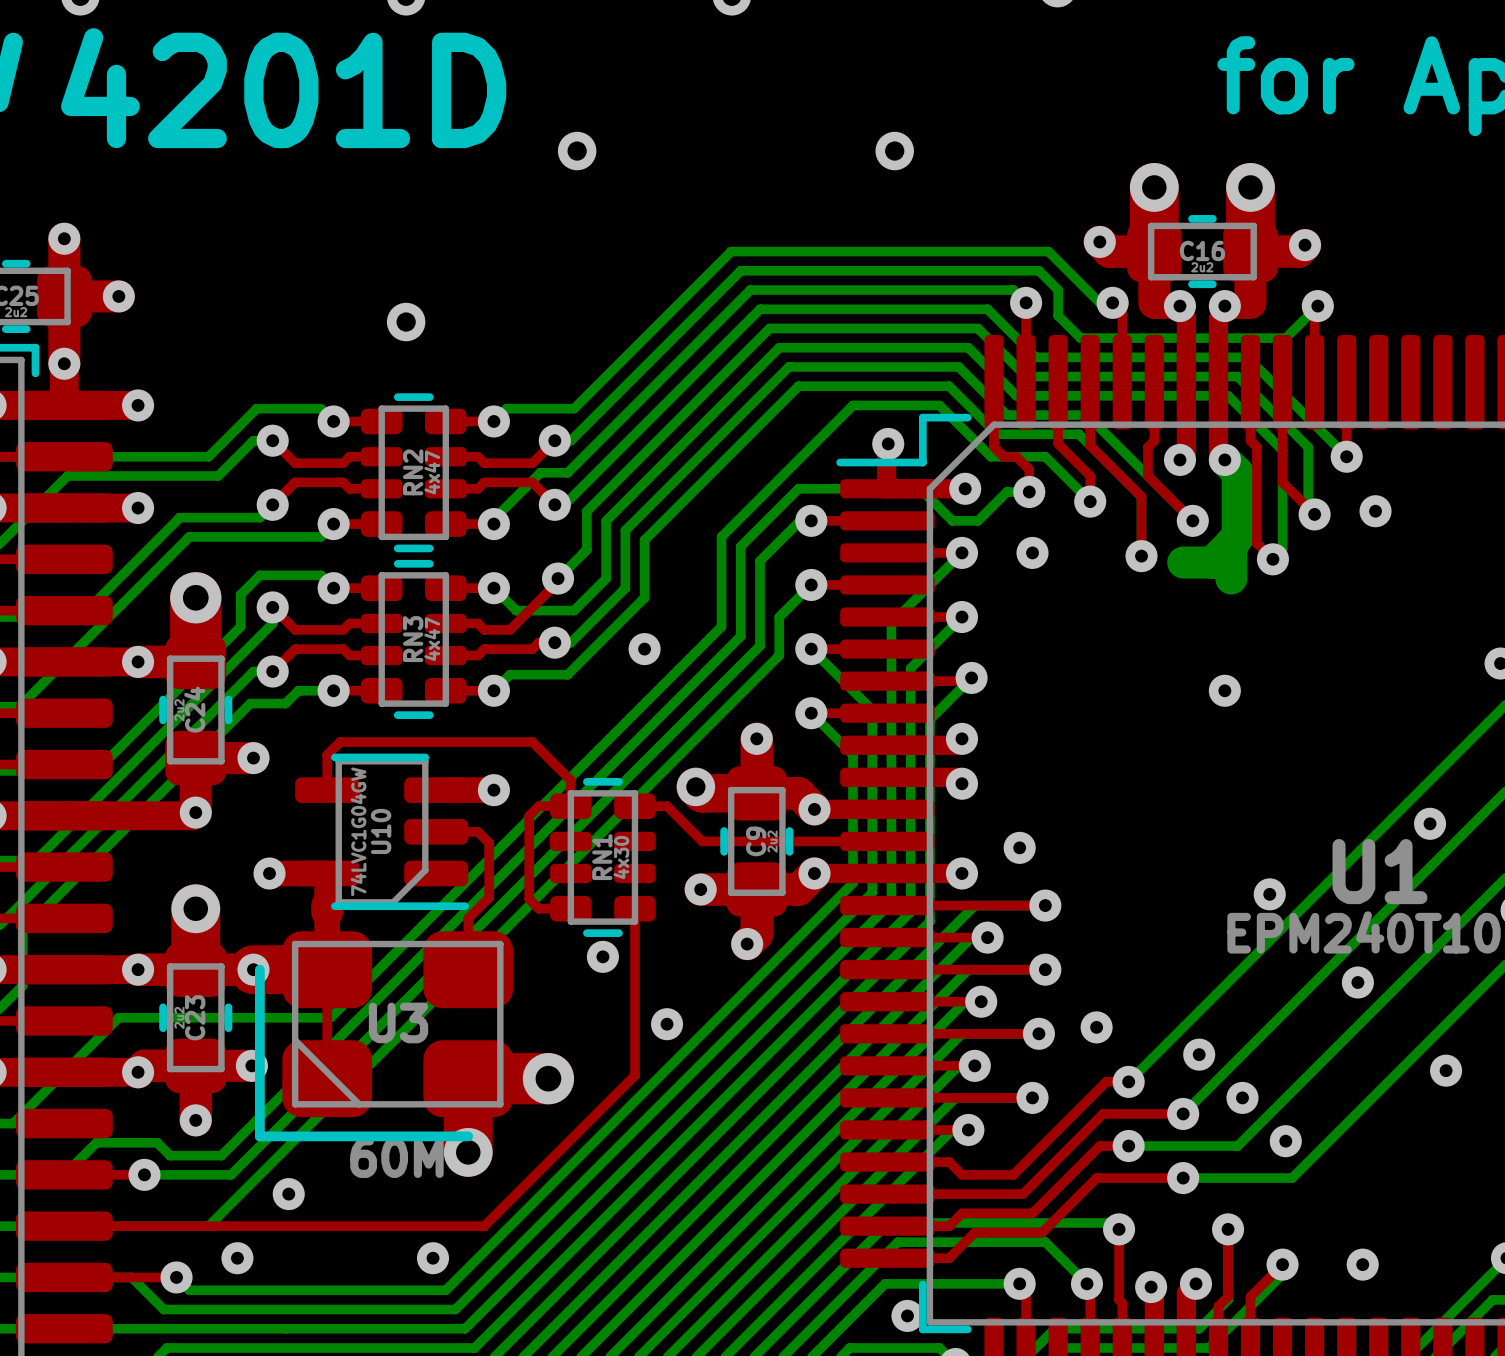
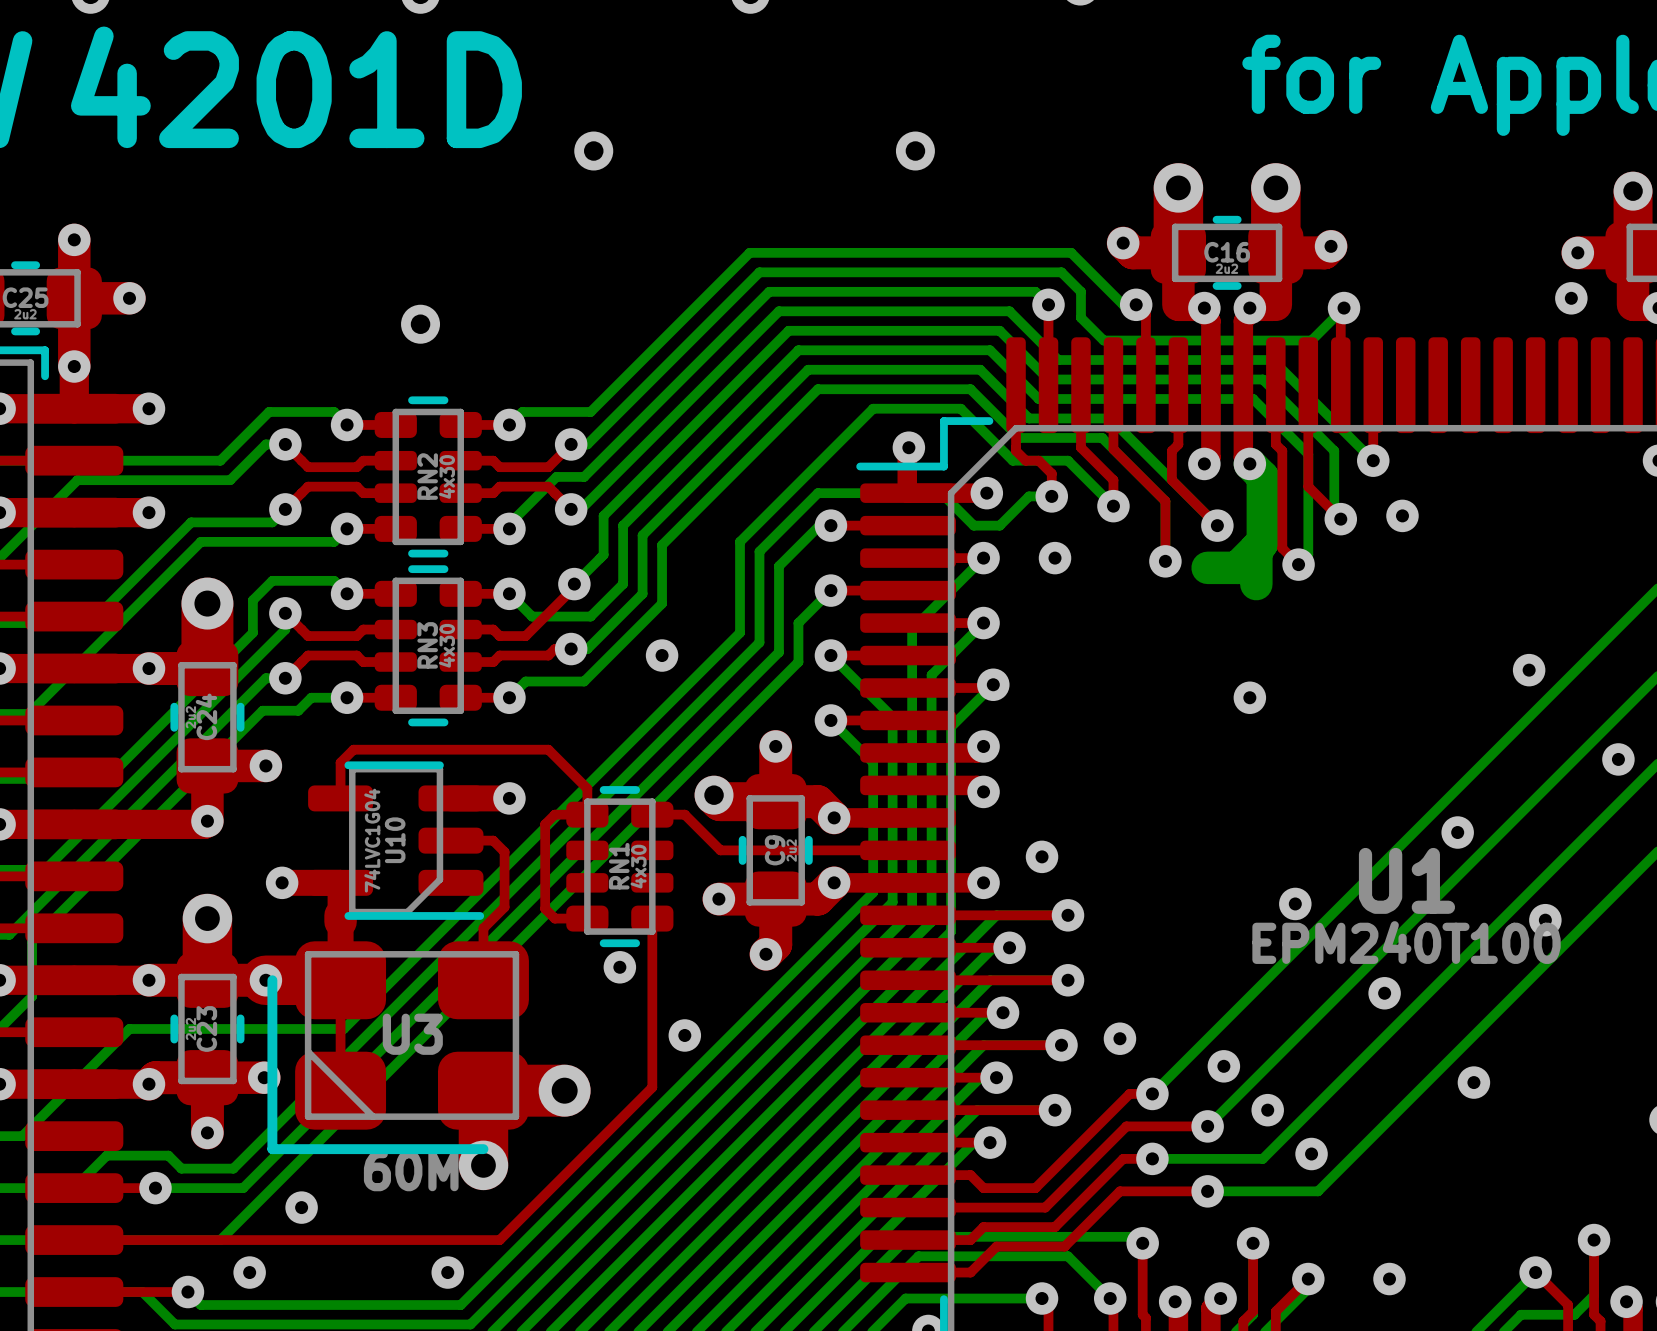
RN2 value: 4x47 (432, 472) -> 4x30 (446, 476)
RN3 value: 4x47 (432, 639) -> 4x30 (446, 645)
U10 value: 74LVC1G04GW (358, 831) -> 74LVC1G04 (372, 840)

